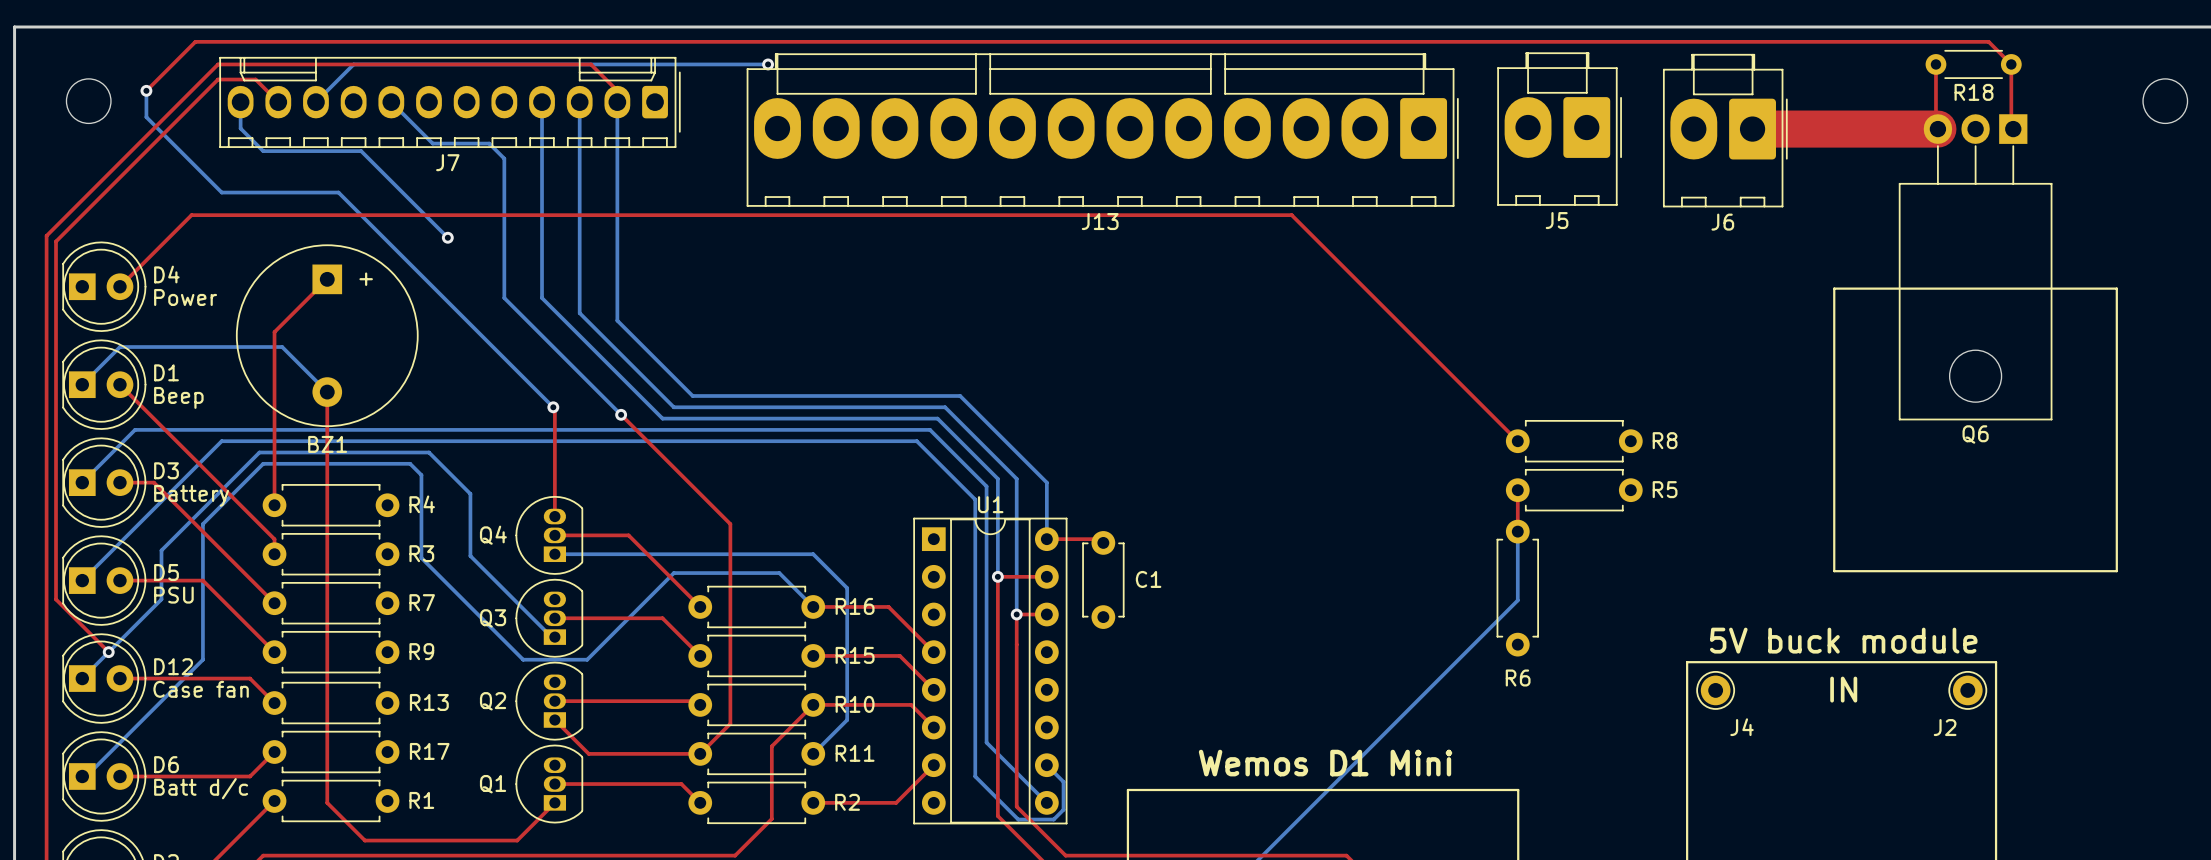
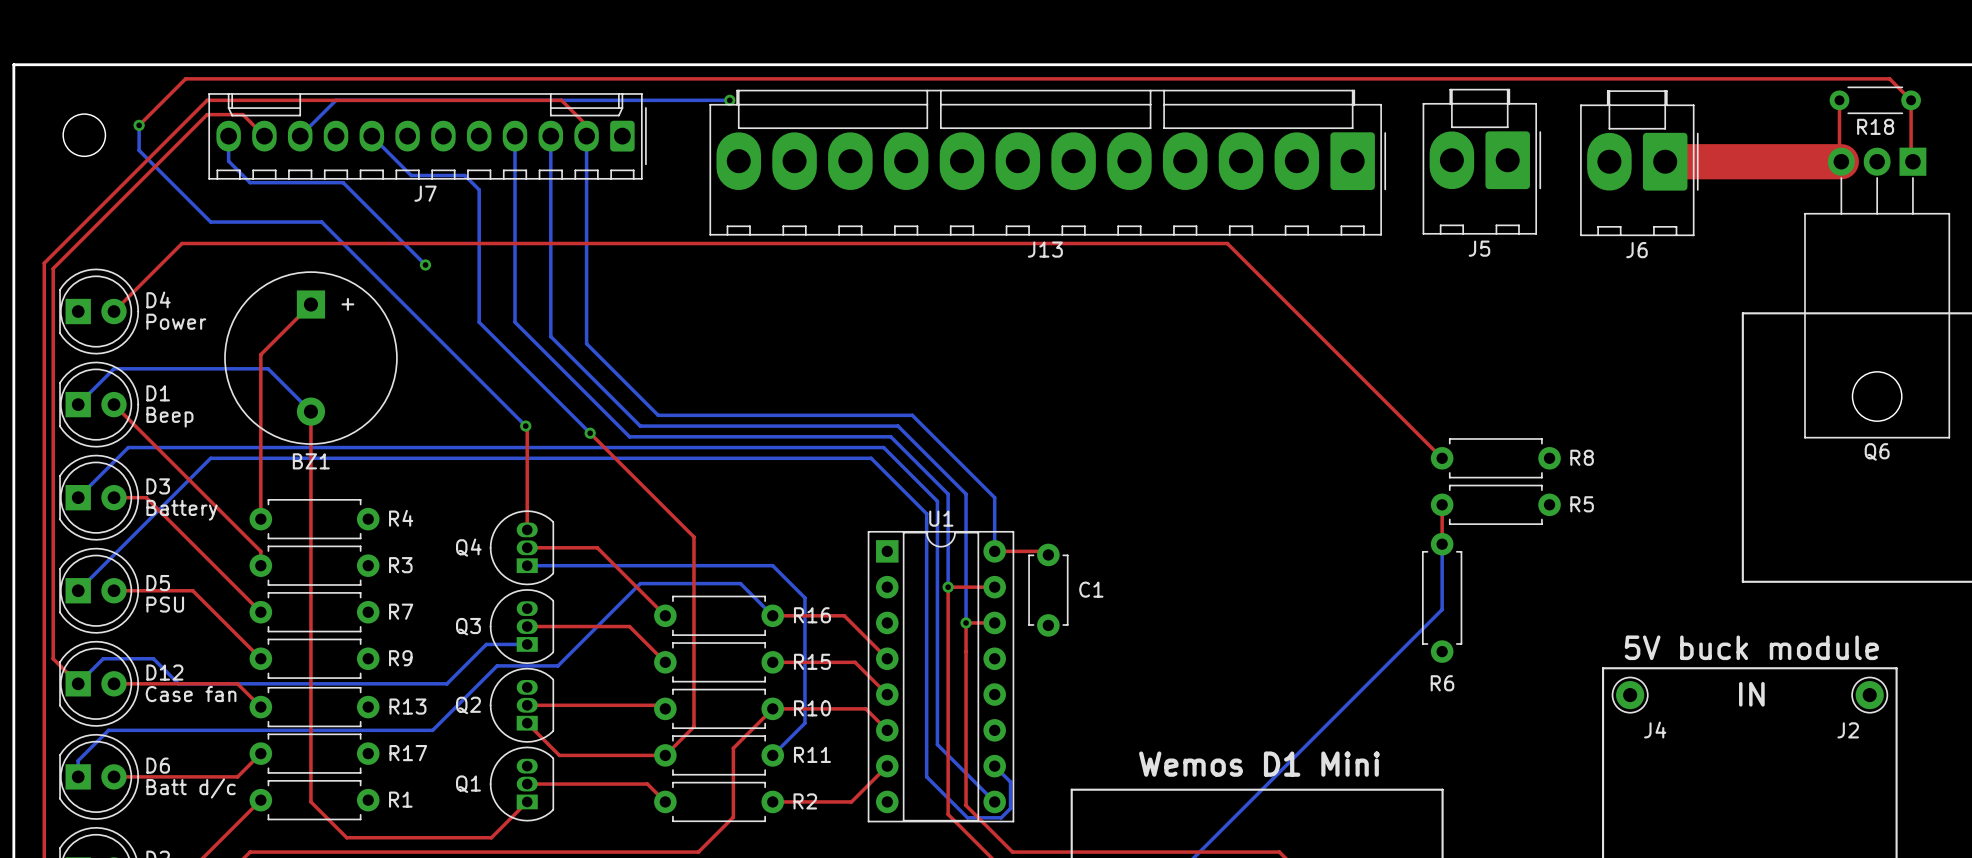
top track: (56, 599) (108, 652) -> (53, 608) (53, 658) (78, 683)
bottom track: (551, 637) (470, 555) (470, 493) (428, 452) (259, 452) (161, 550) (161, 599) (108, 652) -> (524, 644) (486, 644) (446, 683) (178, 683) (153, 658) (103, 658)
via: (108, 652) -> none
bottom track: (523, 659) (421, 557) (421, 475) (410, 463) (263, 463) (202, 524) (202, 659) (86, 776) (82, 776) -> (497, 665) (432, 730) (108, 730) (78, 760) (78, 776)

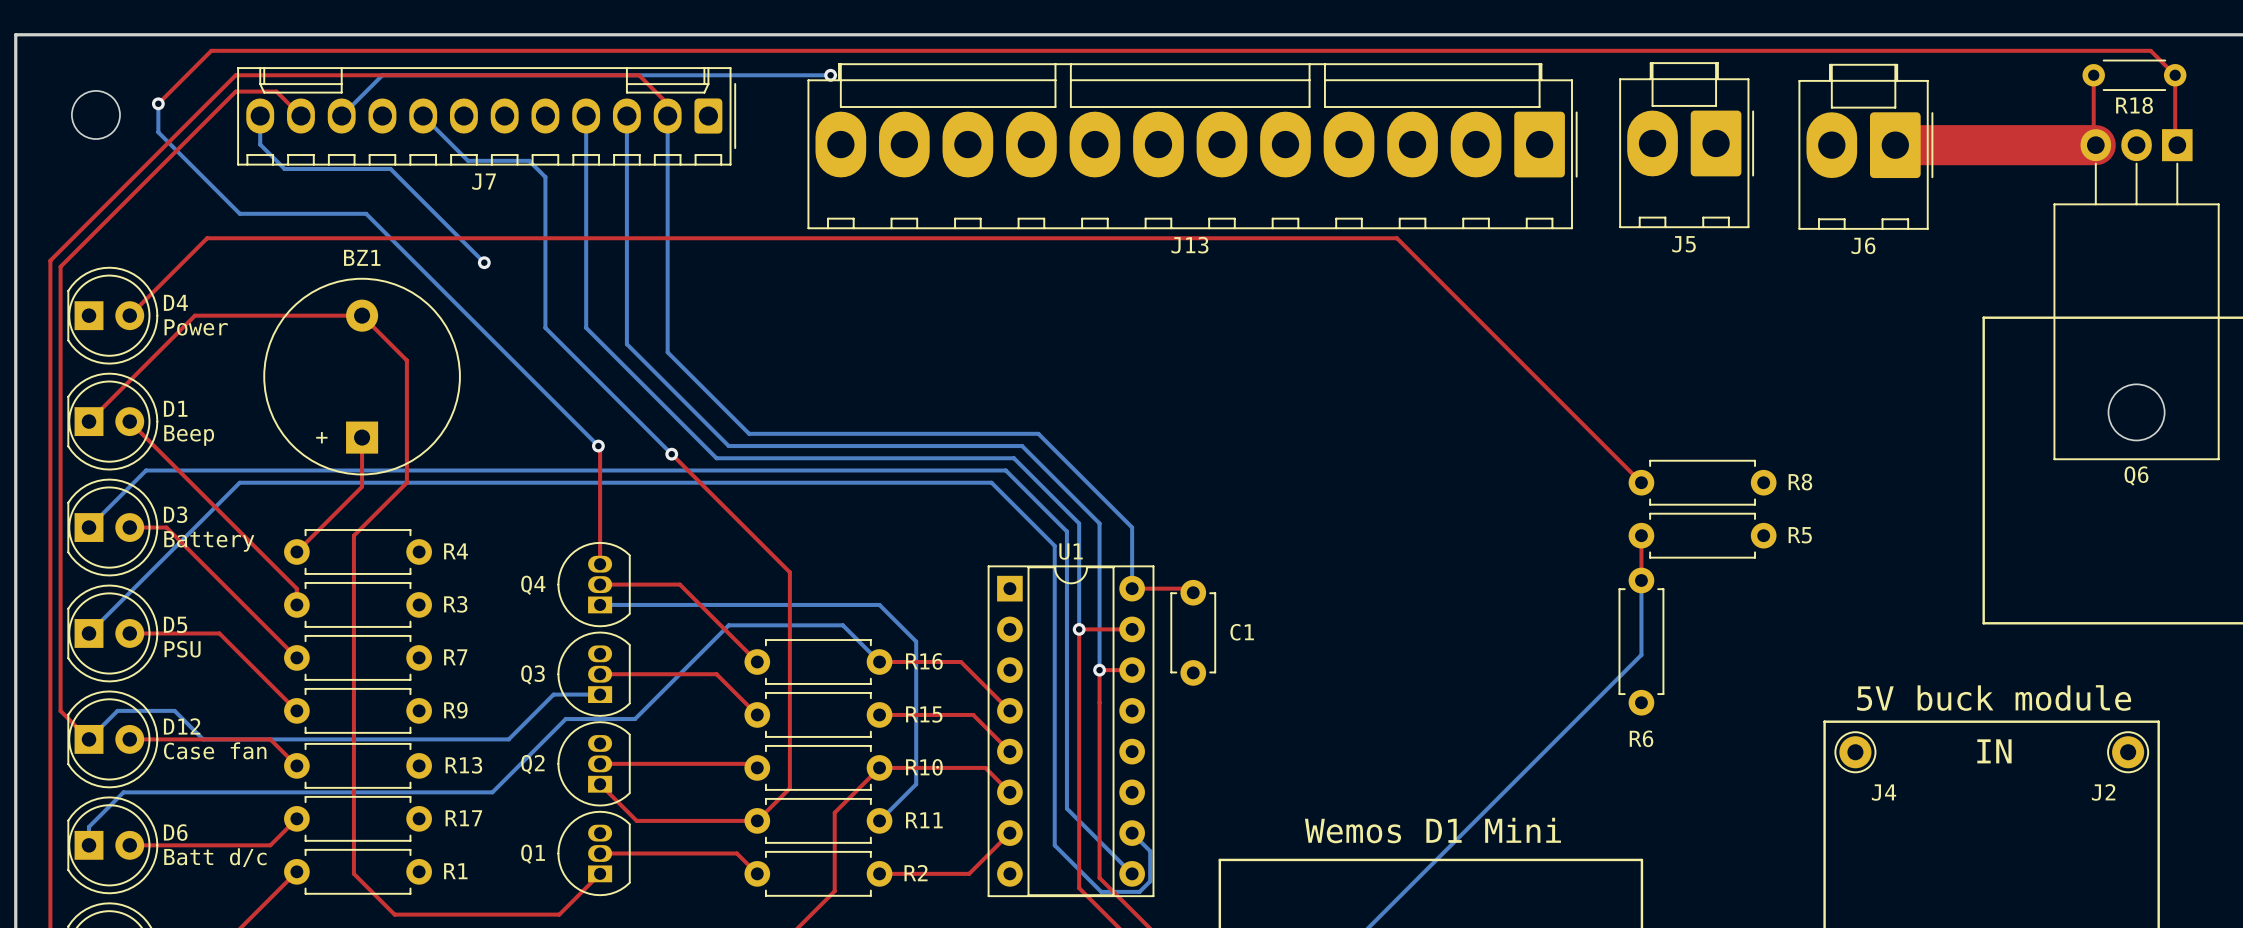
top track: (310, 304) (260, 354) (260, 519) -> (362, 437) (362, 486) (296, 551)
BZ1 rotation: 0° (310, 358) -> 180° (362, 376)
bottom track: (78, 404) (114, 368) (268, 368) (310, 411) -> none
top track: (310, 411) (310, 504) -> (89, 421) (194, 315) (362, 315) (406, 360) (406, 482) (353, 535)

